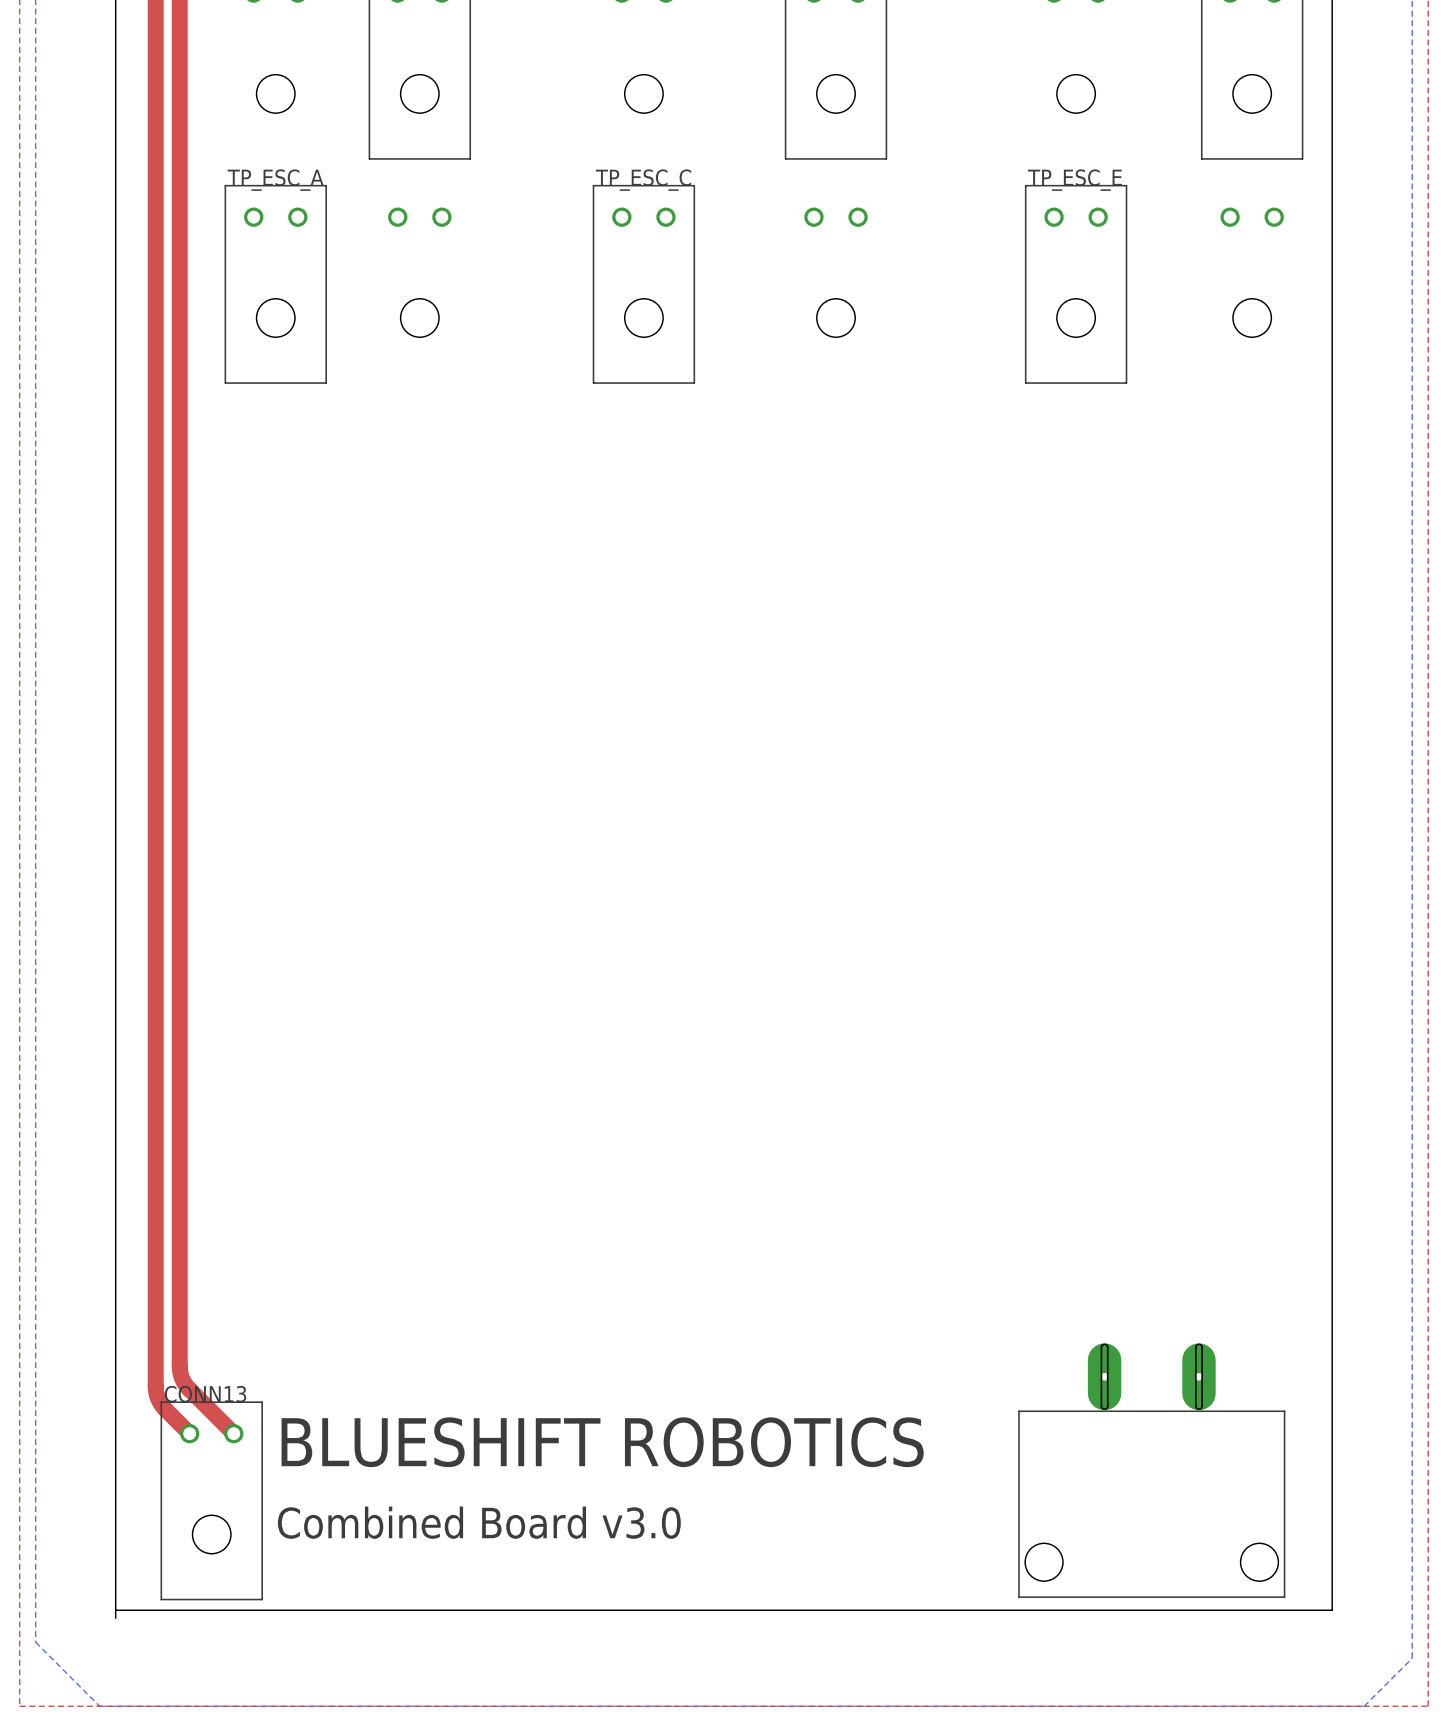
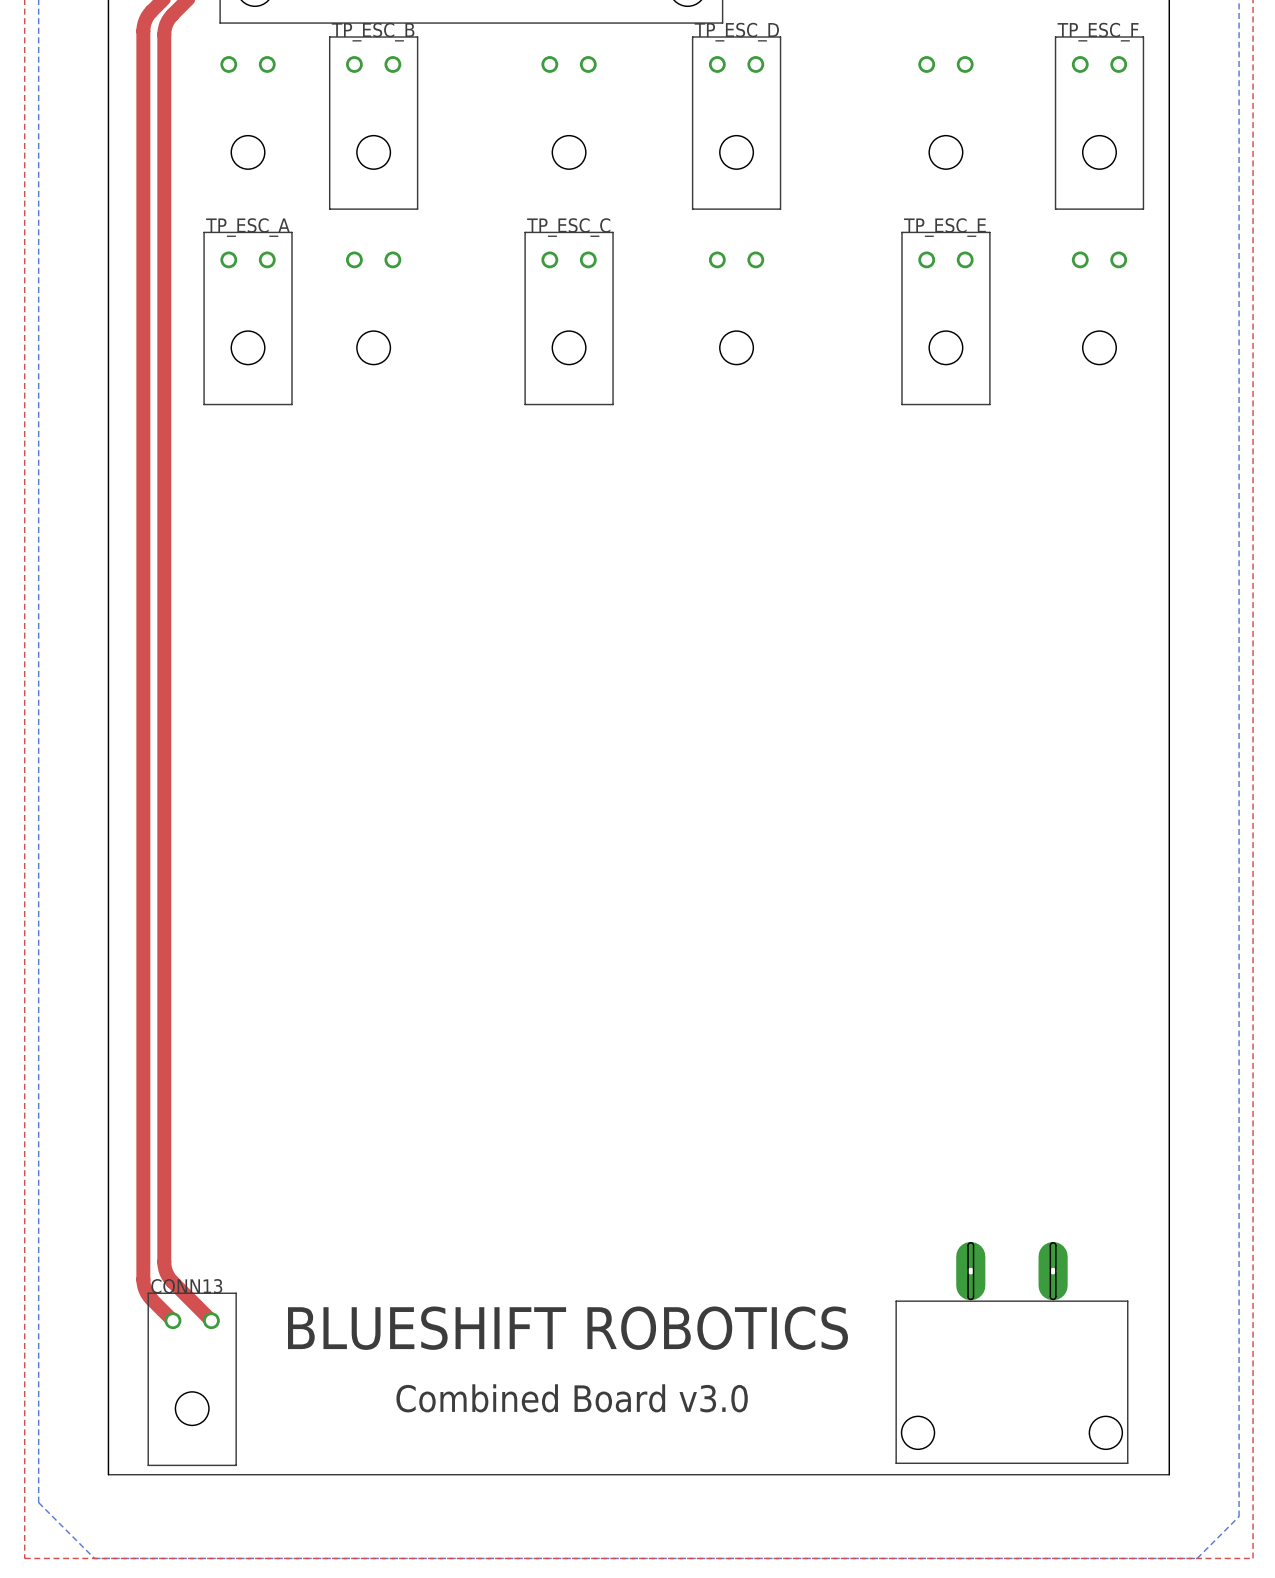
text position: BLUESHIFT ROBOTICS (602, 1442) -> BLUESHIFT ROBOTICS (567, 1328)
text position: Combined Board v3.0 (479, 1522) -> Combined Board v3.0 (572, 1398)
line: none -> (108, 1474) (1169, 1474)
board edge: (1332, 1610) (115, 1610) (115, 1618) -> none

